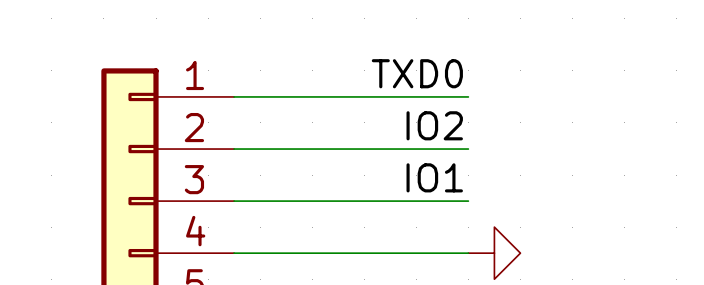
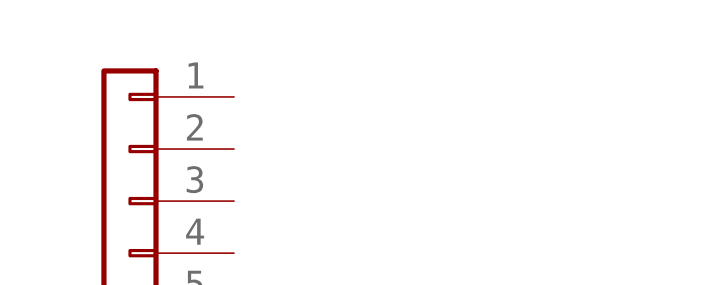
label: TXD0 (417, 73) -> none
wire: (234, 96) (468, 96) -> none
label: IO2 (434, 125) -> none
wire: (234, 149) (468, 149) -> none
label: IO1 (434, 177) -> none
wire: (234, 201) (468, 201) -> none
wire: (234, 253) (468, 253) -> none
power symbol: (494, 253) -> none

